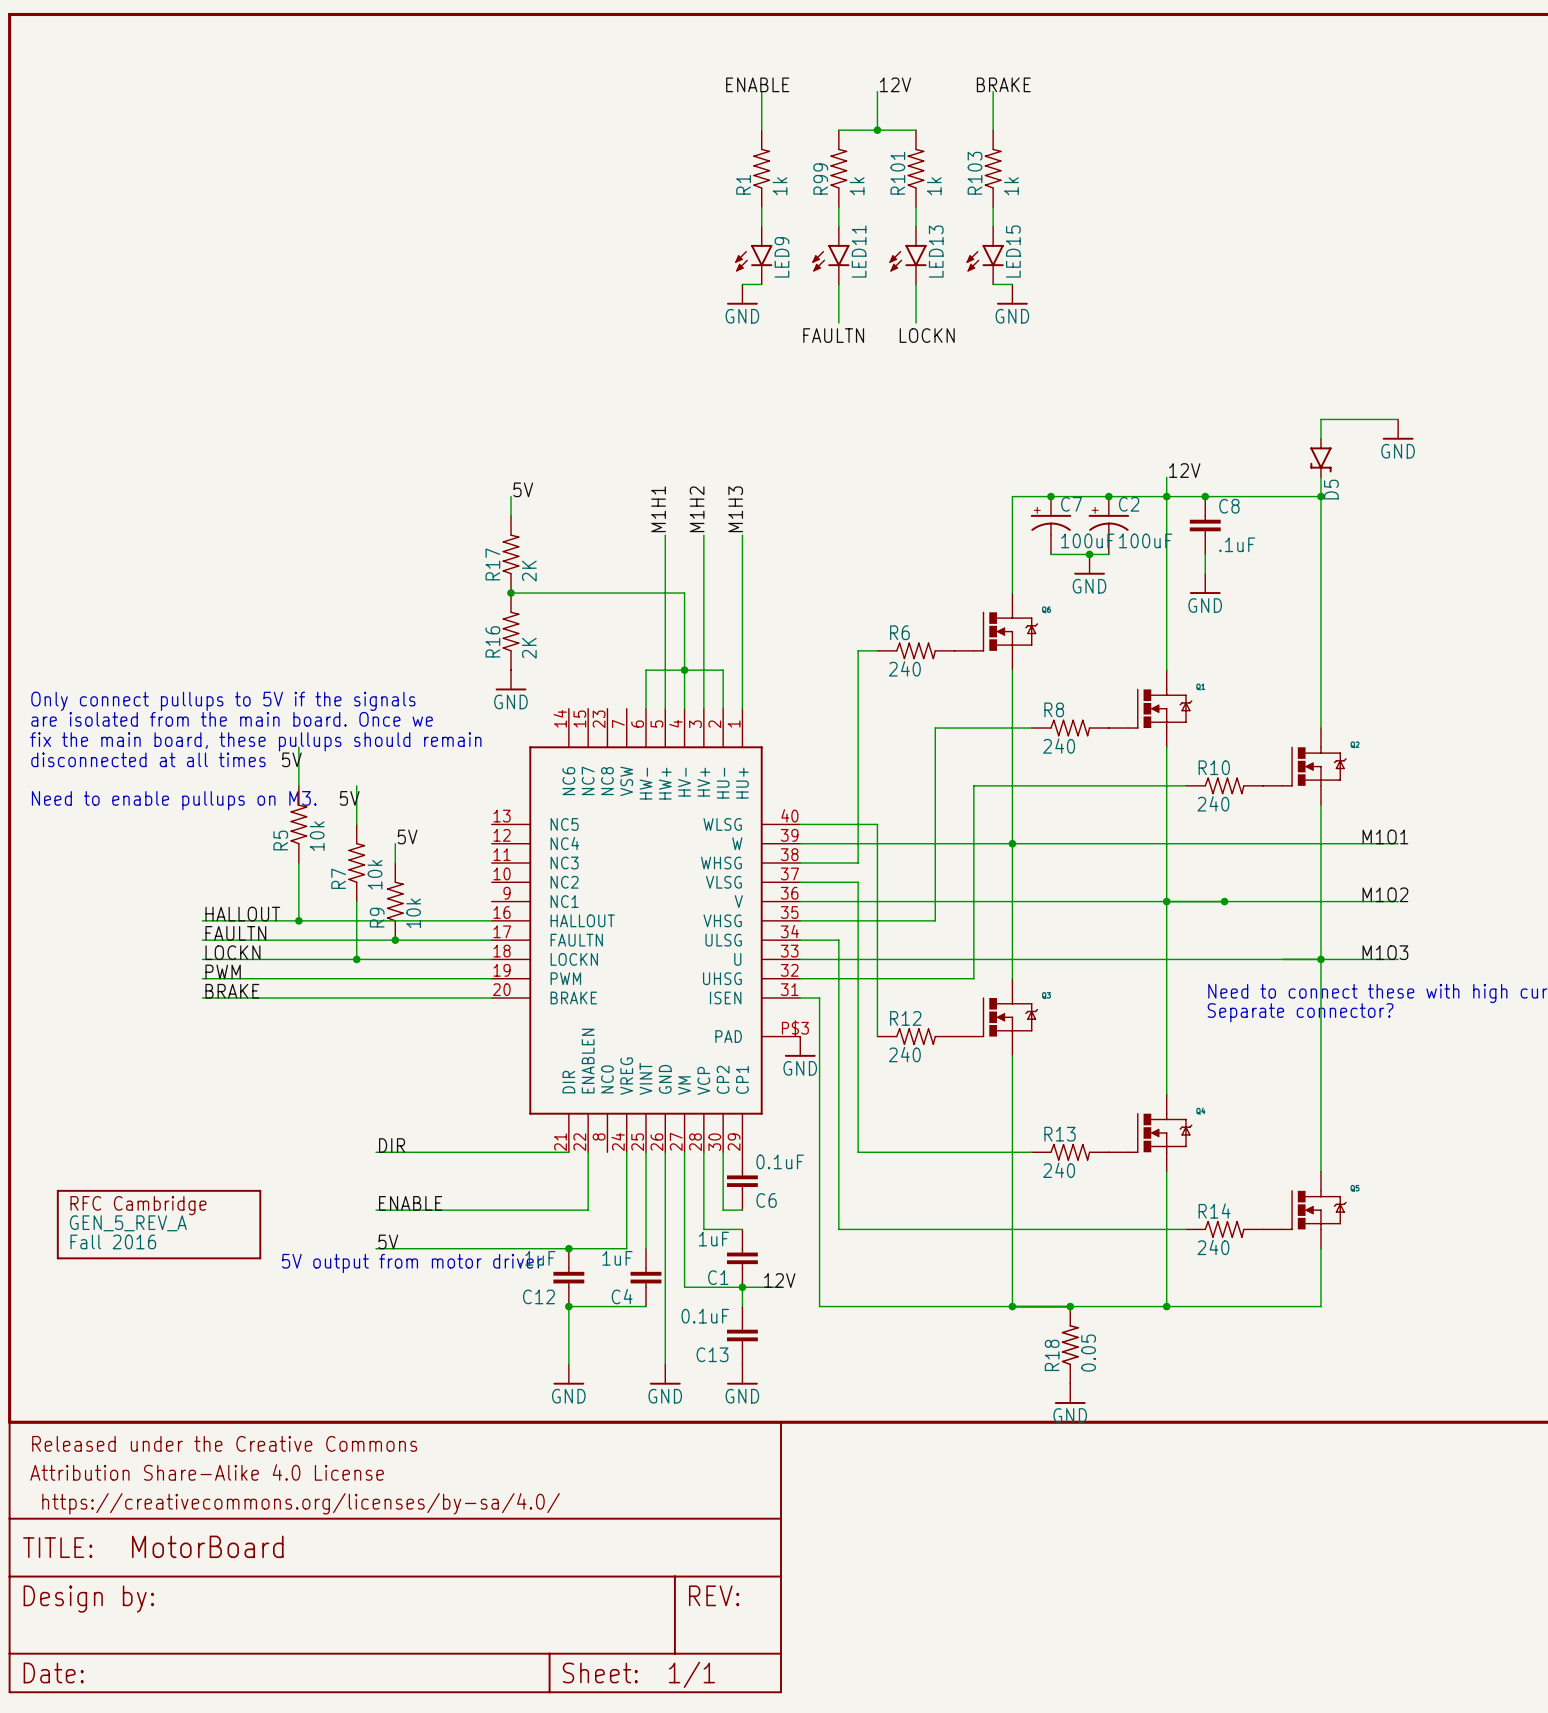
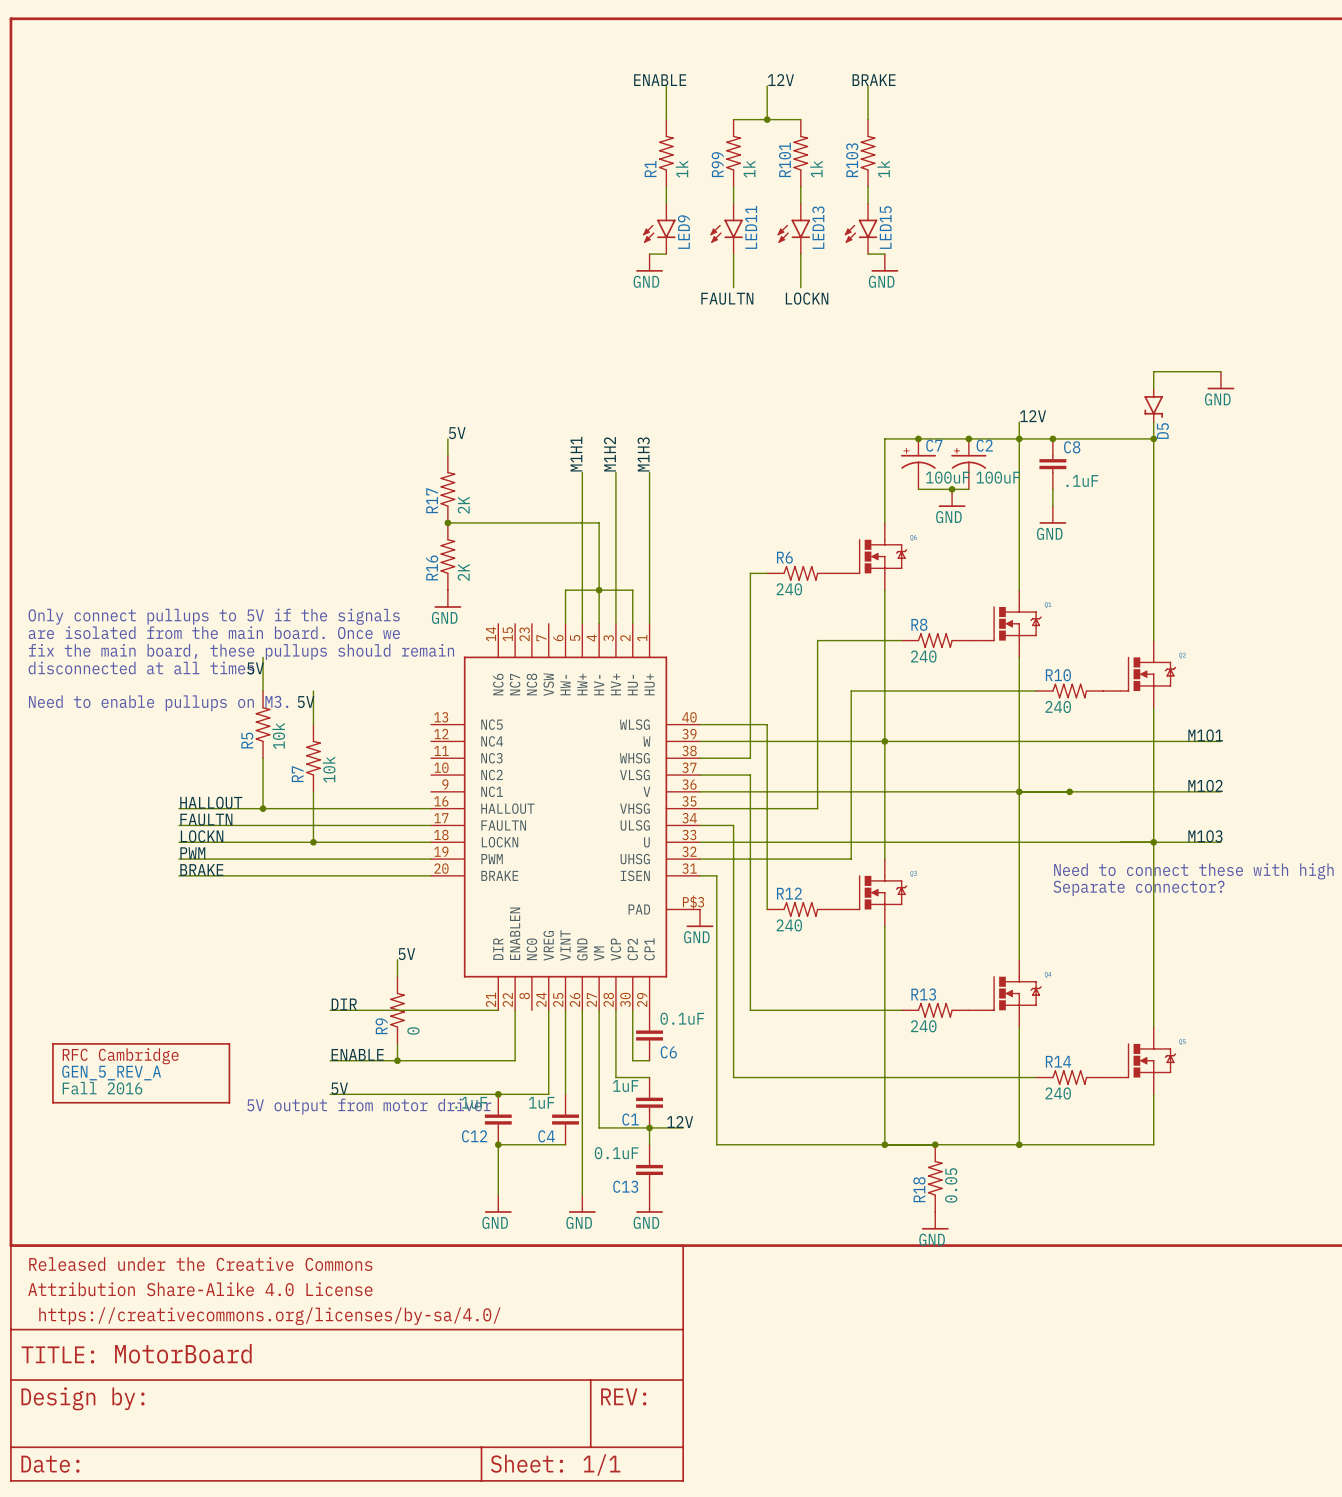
label: 5V (407, 836) -> none
wire: (395, 843) (395, 863) -> none
R9 position: (395, 901) -> (397, 1010)
R9 value: 10k (413, 913) -> 0 (413, 1030)
junction: (395, 940) -> none
label: none -> 5V (406, 954)
wire: none -> (397, 959) (397, 976)
wire: none -> (397, 1043) (397, 1060)
junction: none -> (397, 1060)

